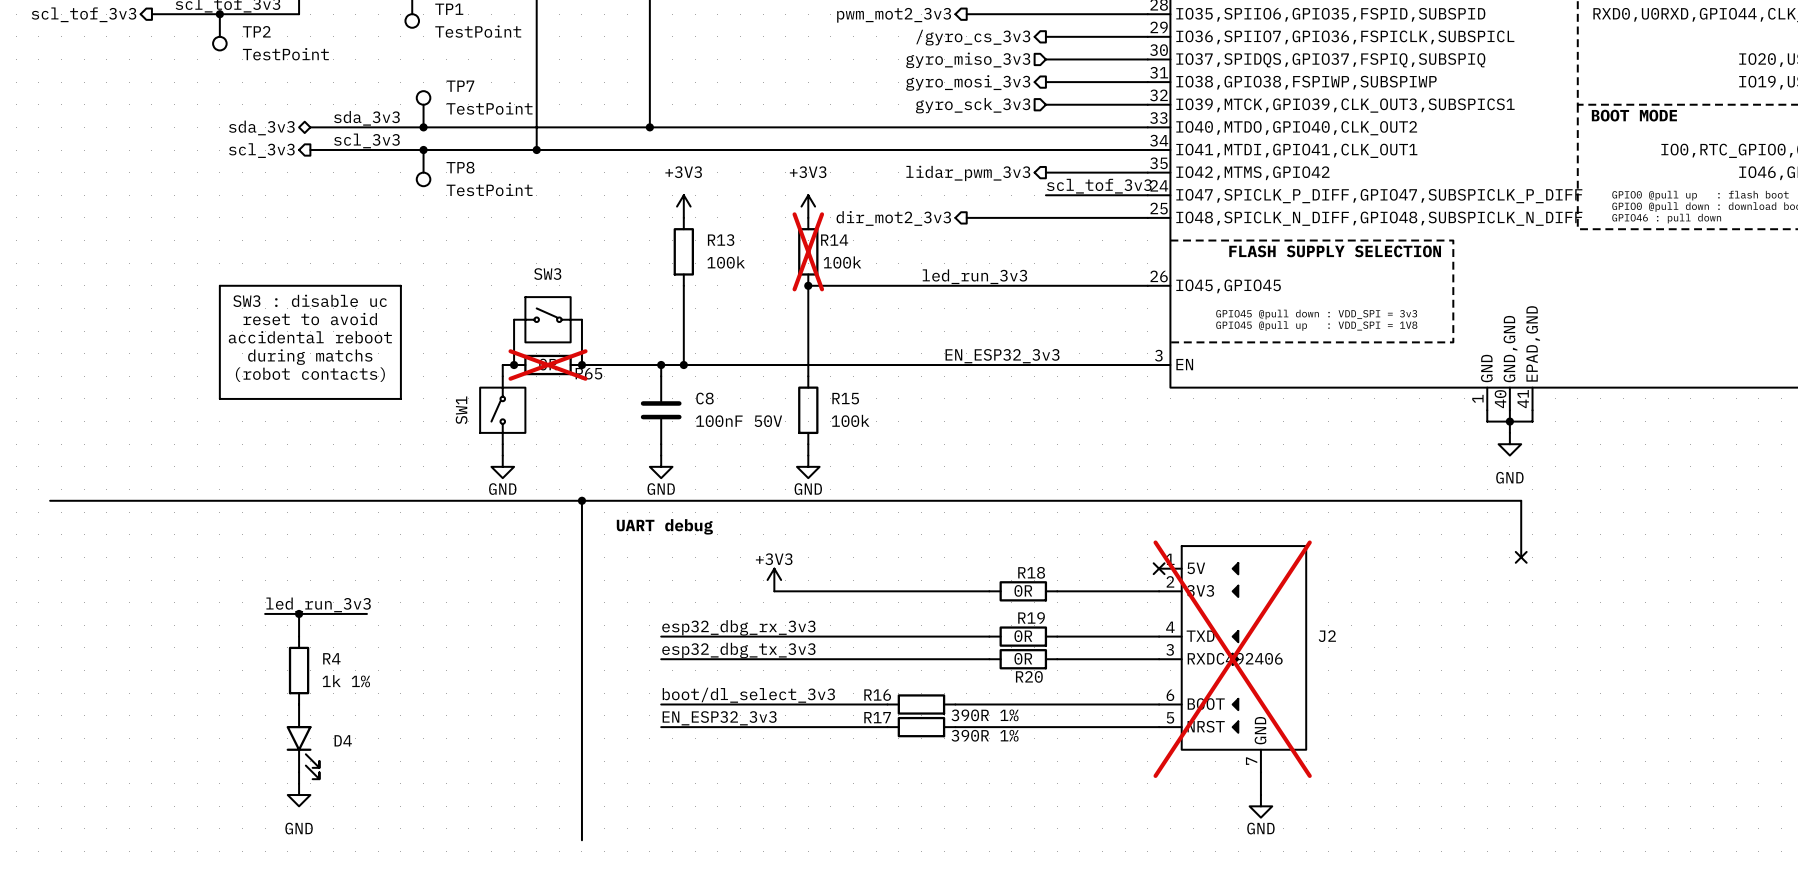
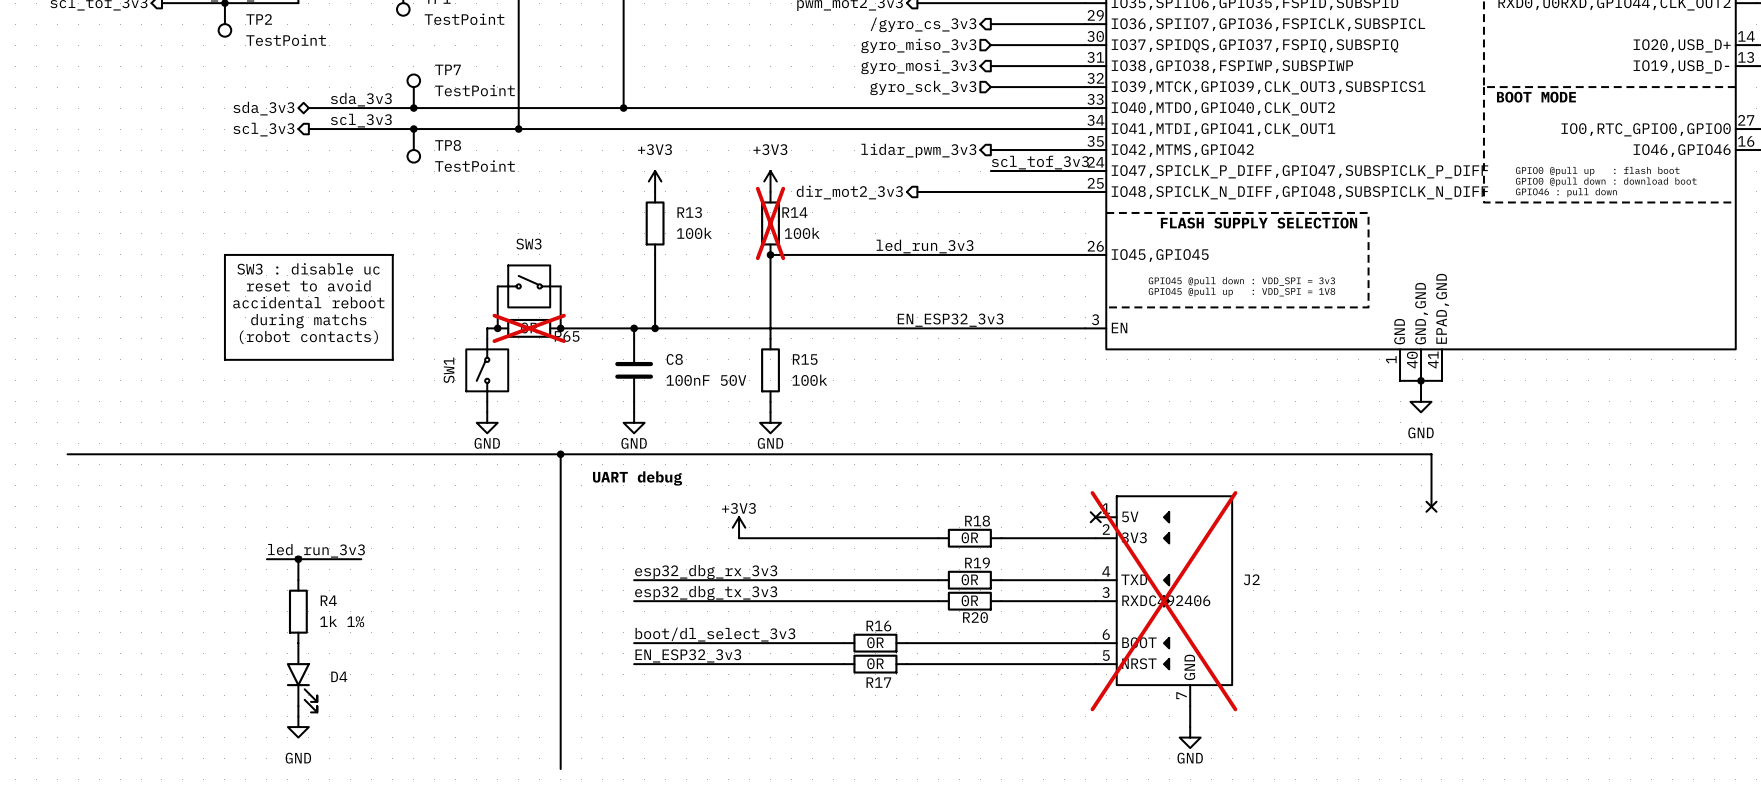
R16 name position: R16 (877, 695) -> R16 (878, 626)
R16 value: 390R 1% (985, 715) -> 0R (875, 642)
R17 name position: R17 (877, 717) -> R17 (878, 682)
R17 value: 390R 1% (985, 735) -> 0R (875, 663)

